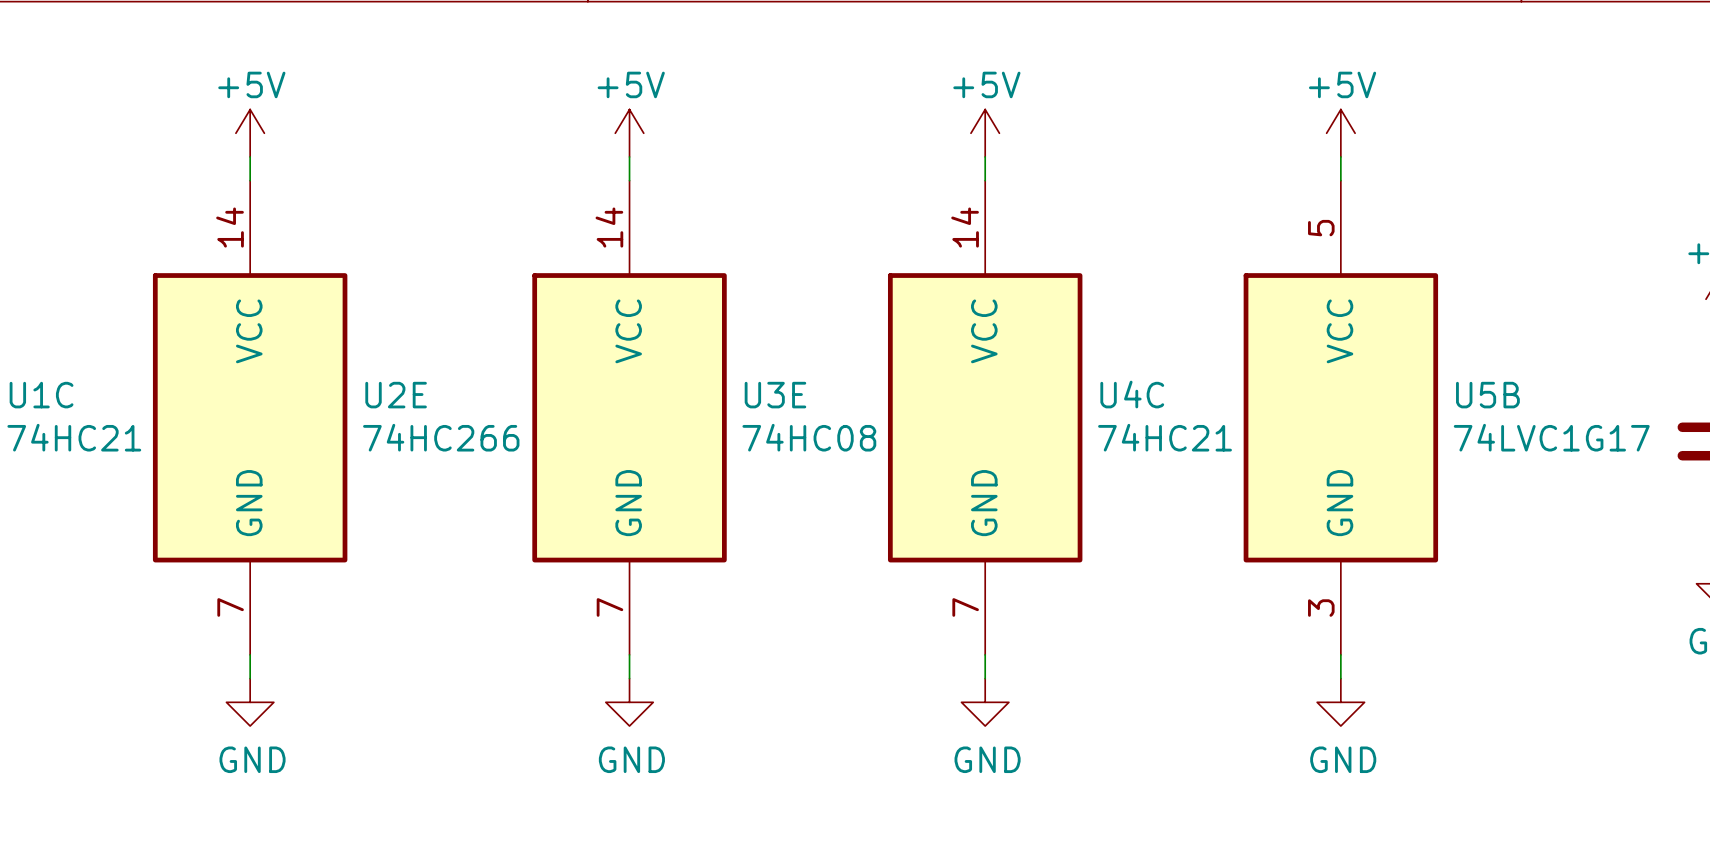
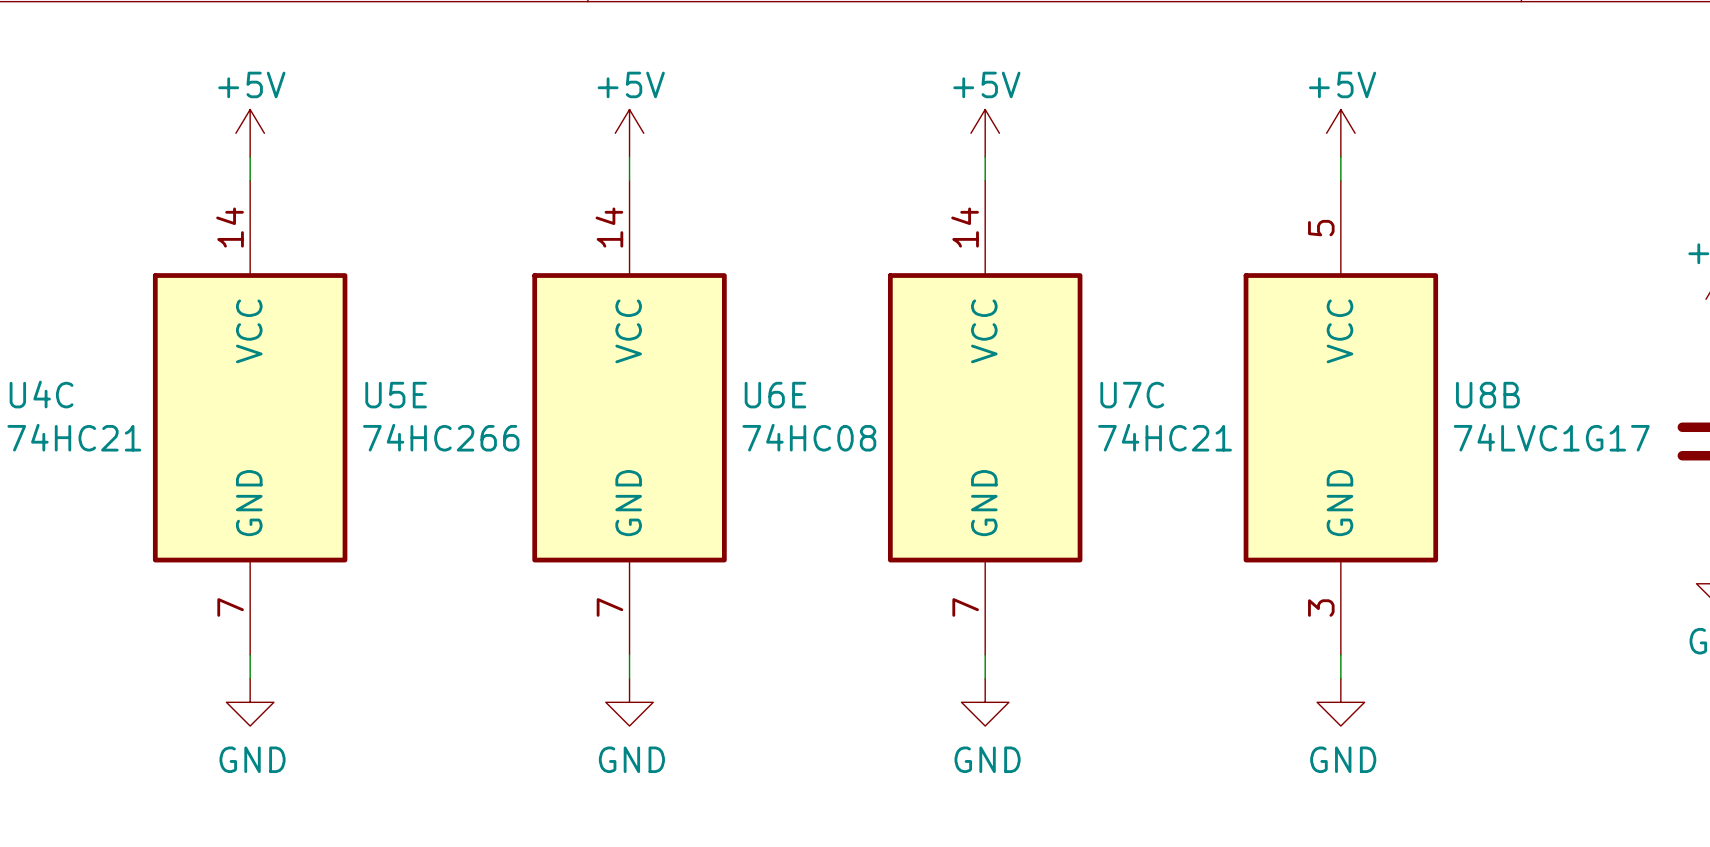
U4C name: U4C (1132, 394) -> U7C (1132, 395)
U1C name: U1C (41, 395) -> U4C (41, 394)
U2E name: U2E (396, 395) -> U5E (396, 395)
U3E name: U3E (775, 395) -> U6E (775, 395)
U5B name: U5B (1487, 395) -> U8B (1487, 395)

